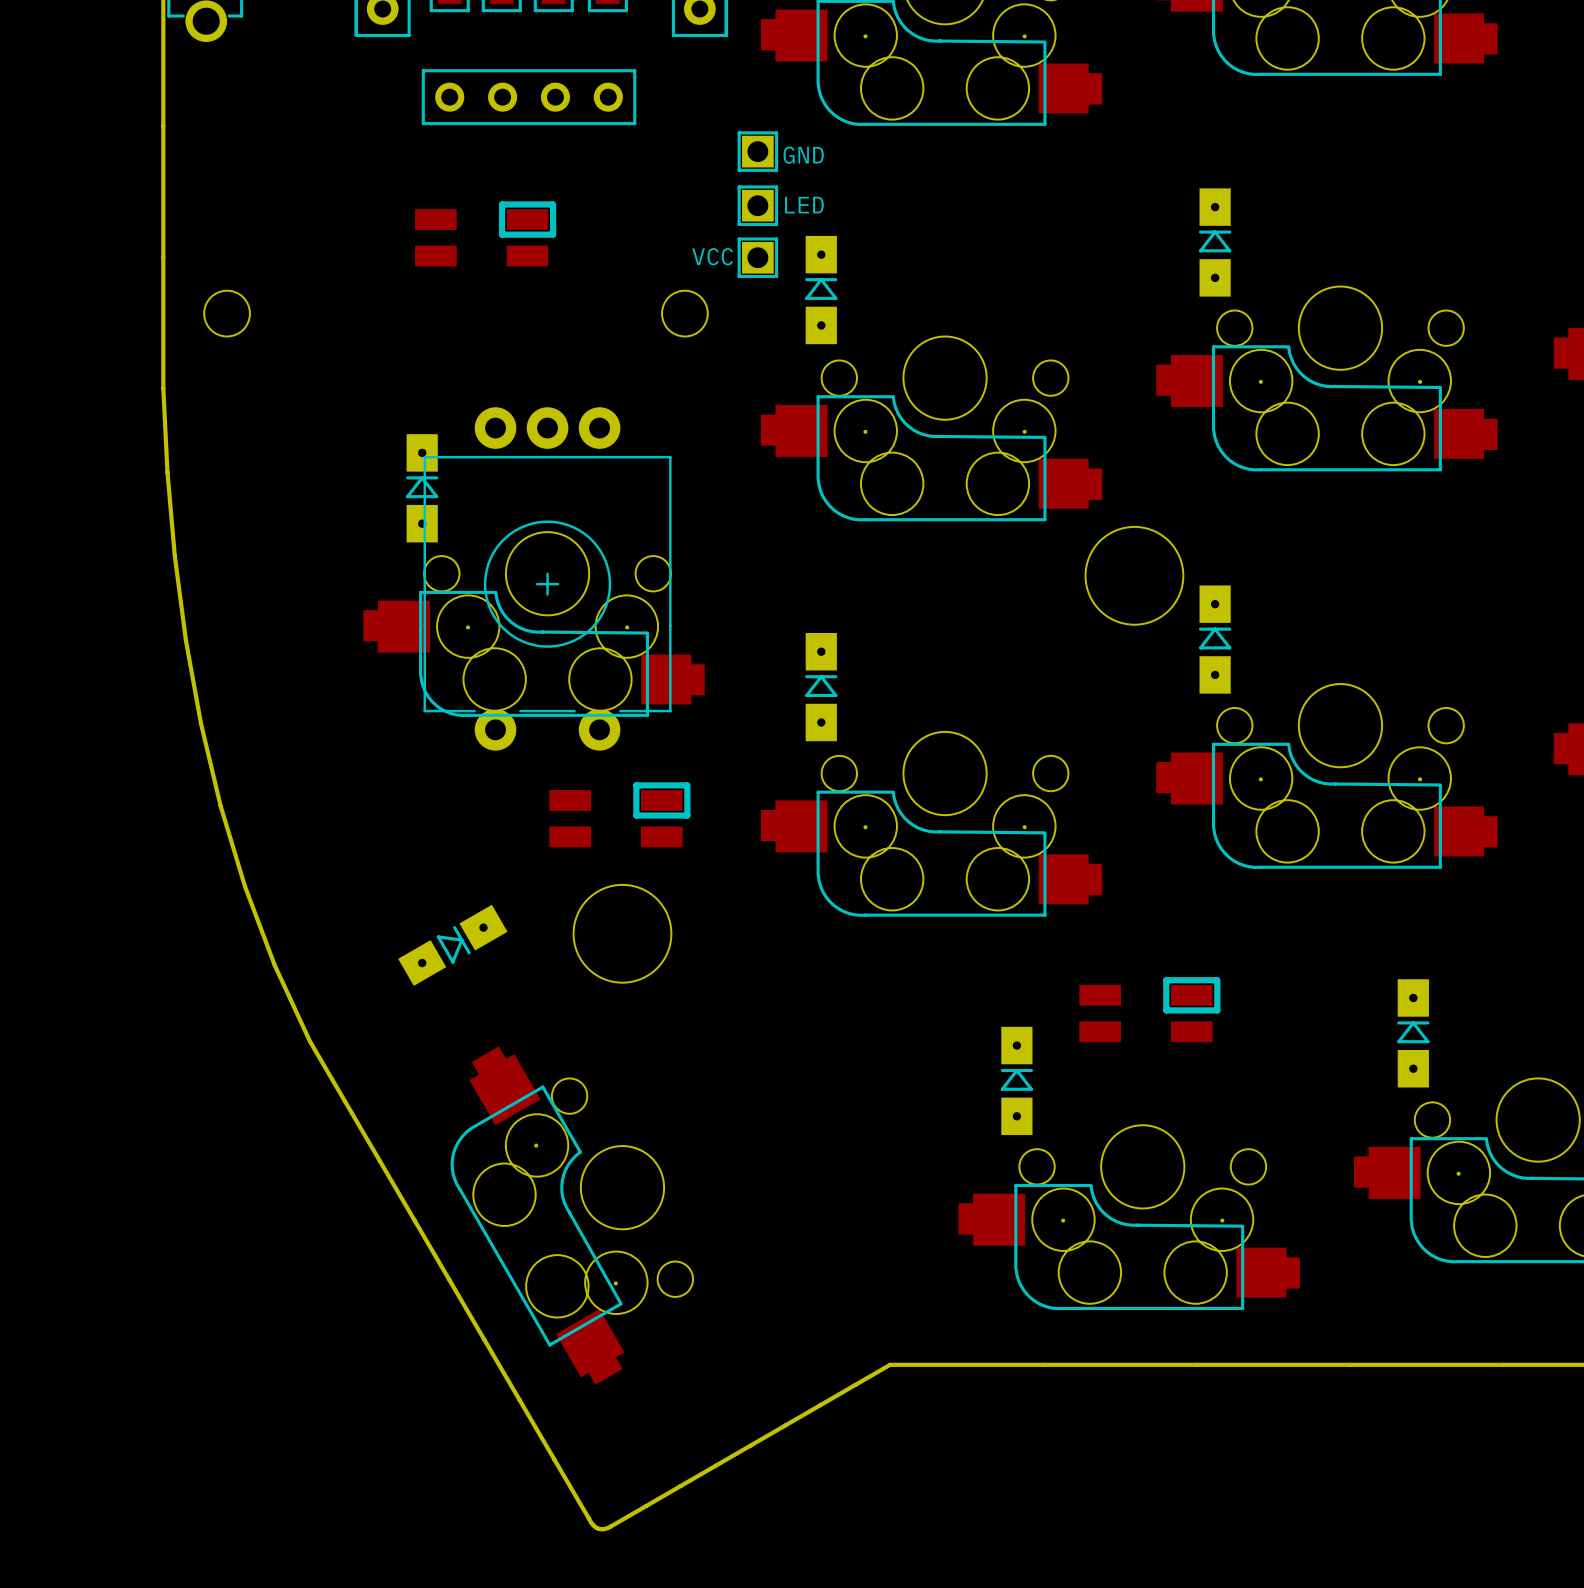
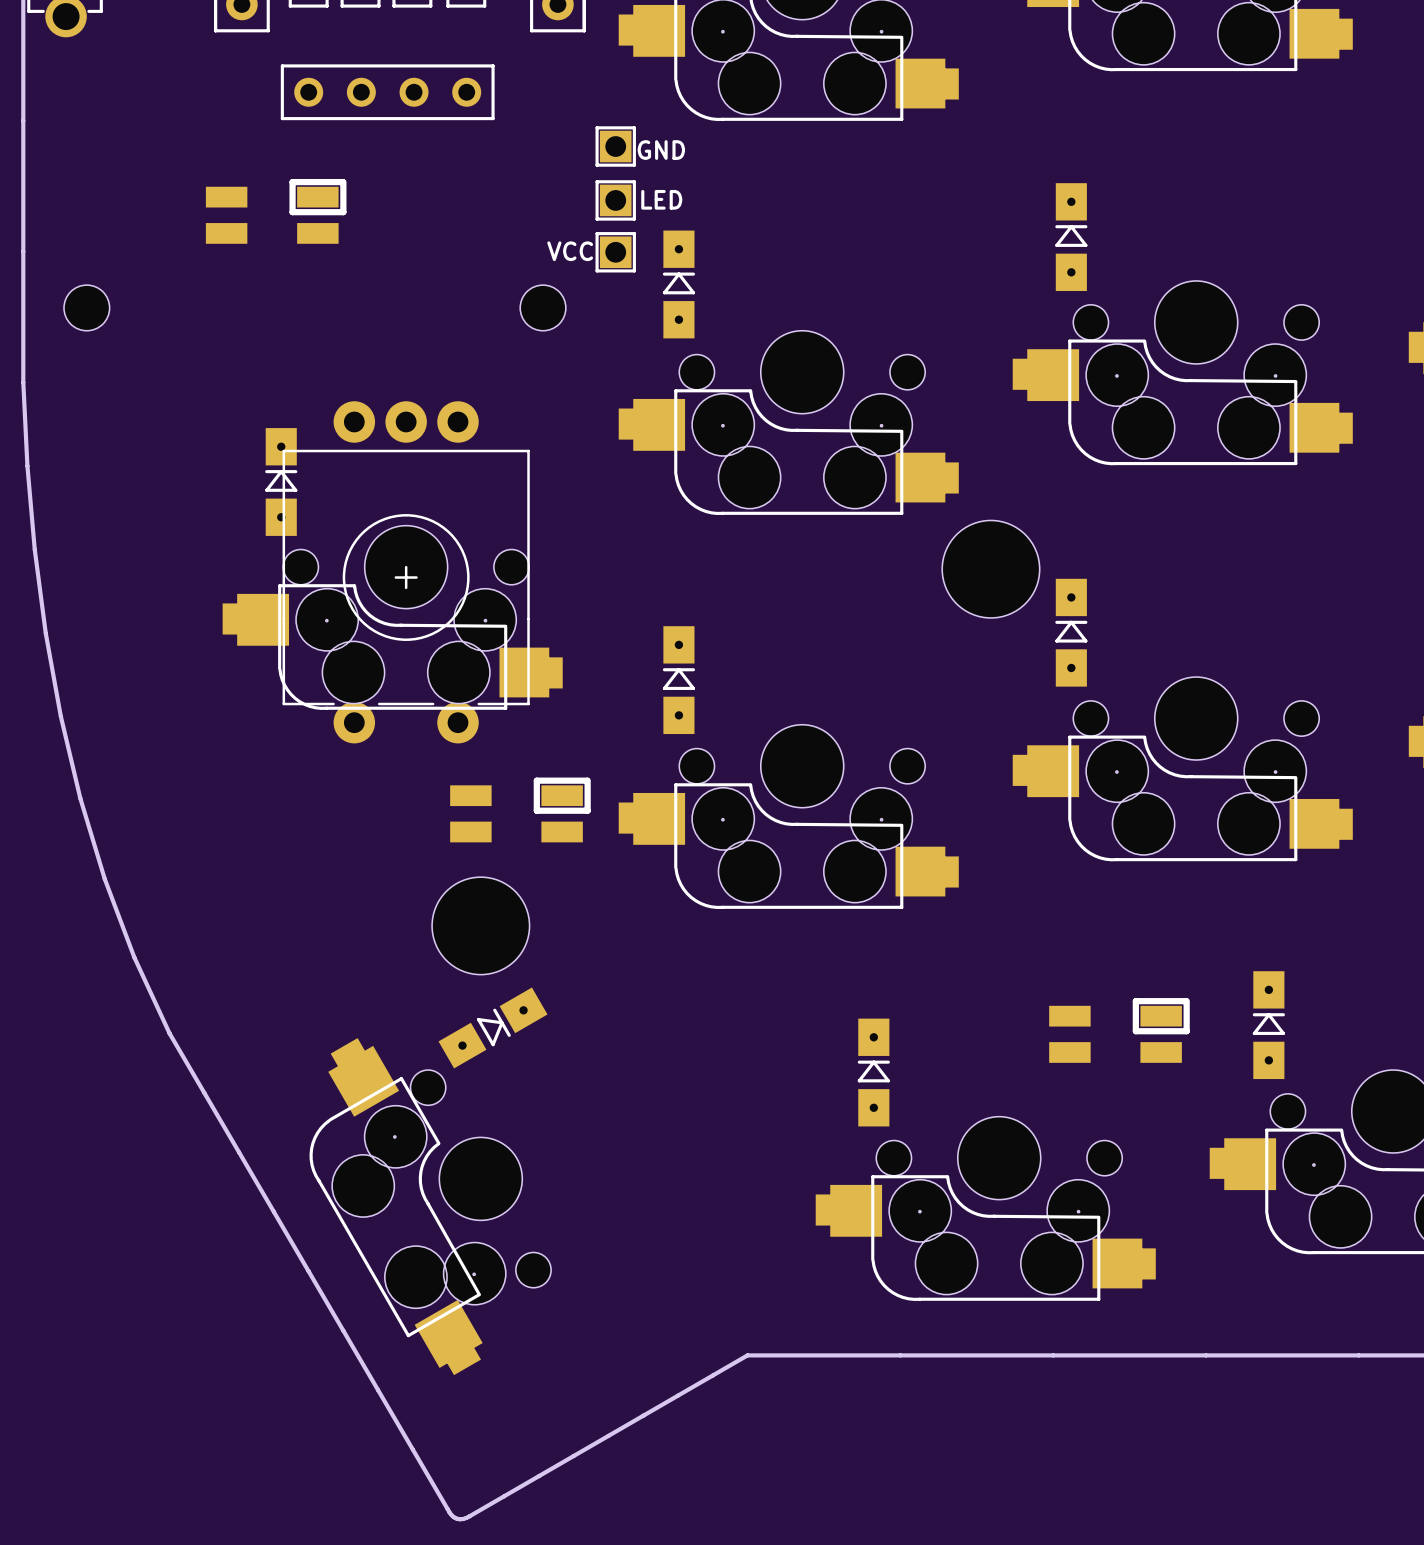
part position: (485, 233) -> (276, 211)
part position: (619, 814) -> (520, 809)
part position: (452, 945) -> (493, 1027)
part position: (1149, 1009) -> (1119, 1030)

